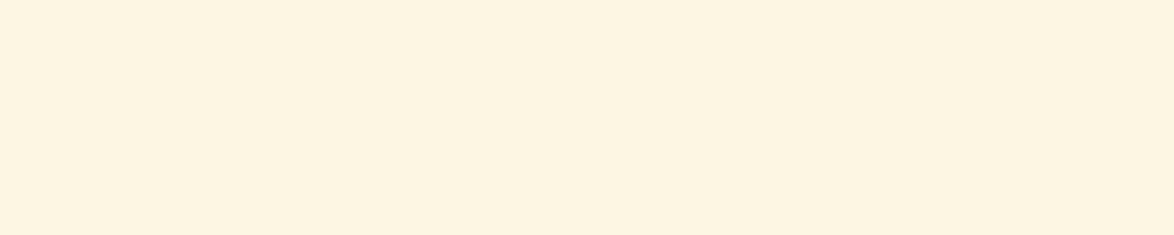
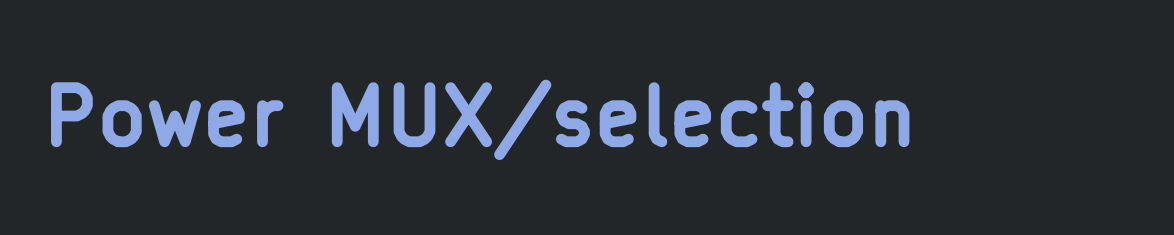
text: none -> Power MUX/selection (480, 119)

